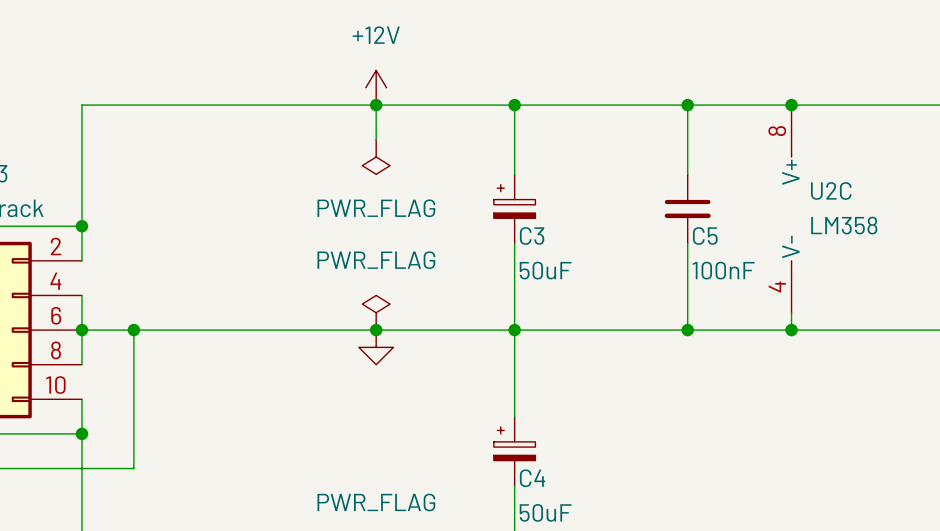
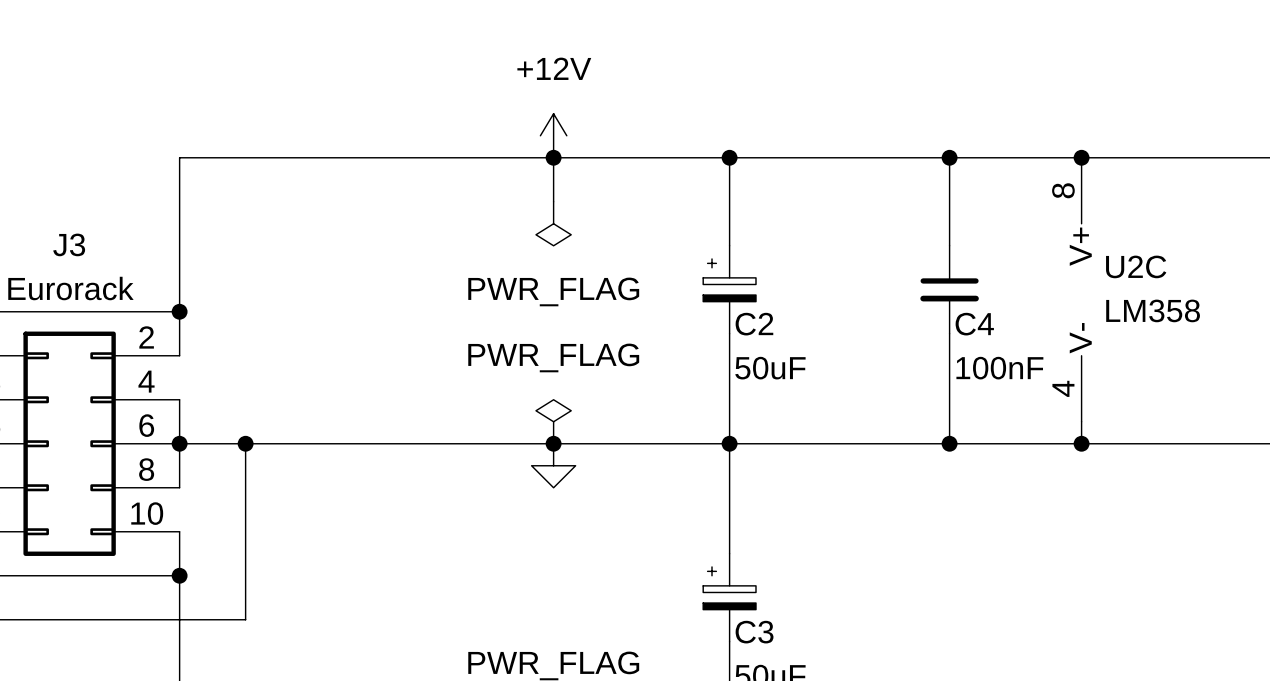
C3 name: C3 (532, 235) -> C2 (754, 324)
C5 name: C5 (705, 235) -> C4 (974, 324)
C4 name: C4 (532, 478) -> C3 (754, 632)

